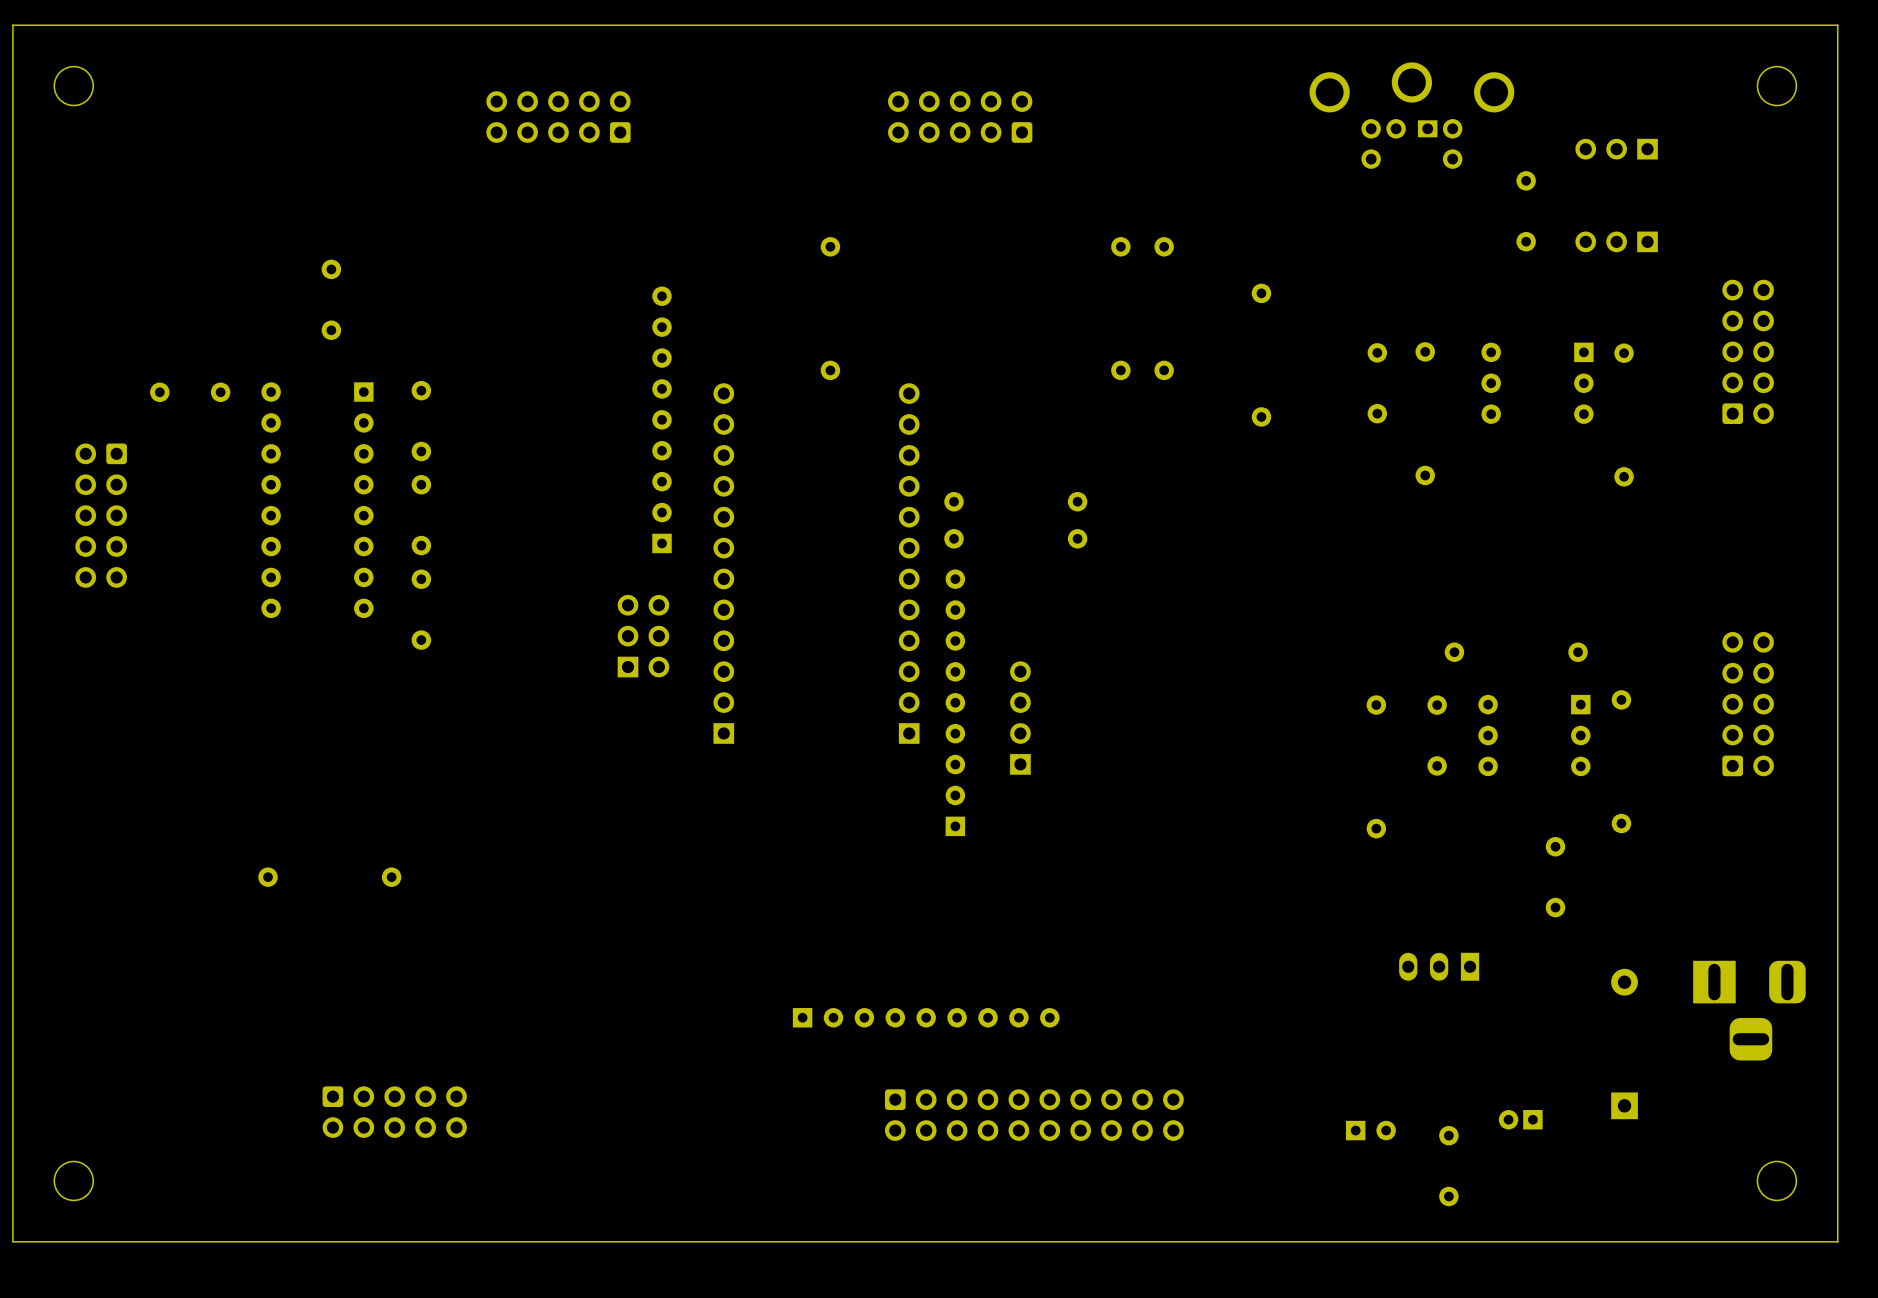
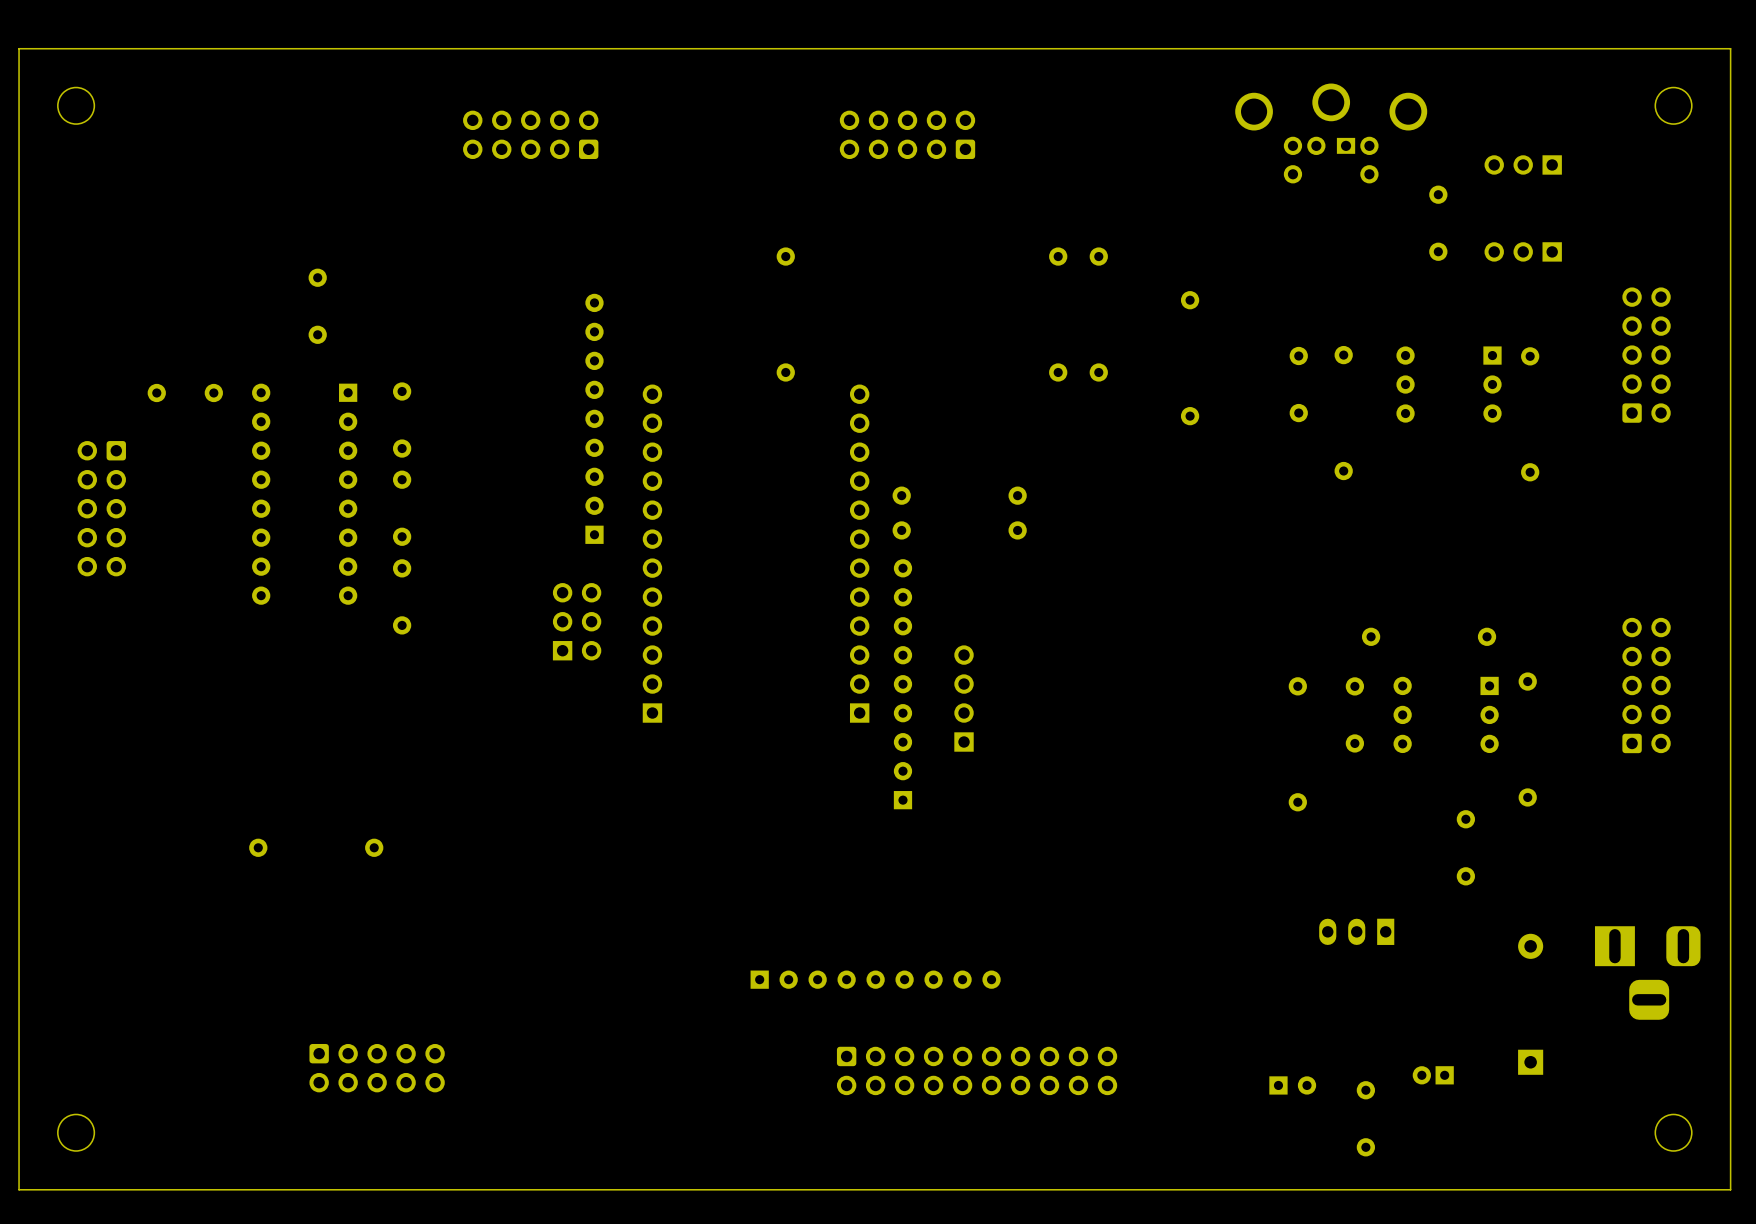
part position: (662, 419) -> (594, 418)
part position: (723, 563) -> (652, 553)
part position: (643, 636) -> (577, 621)

